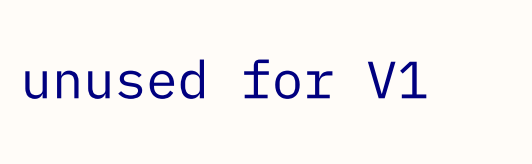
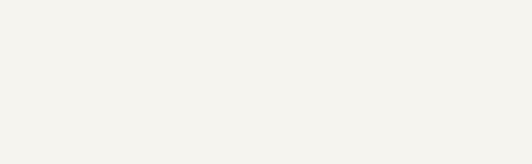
text: unused for V1 (225, 79) -> none

